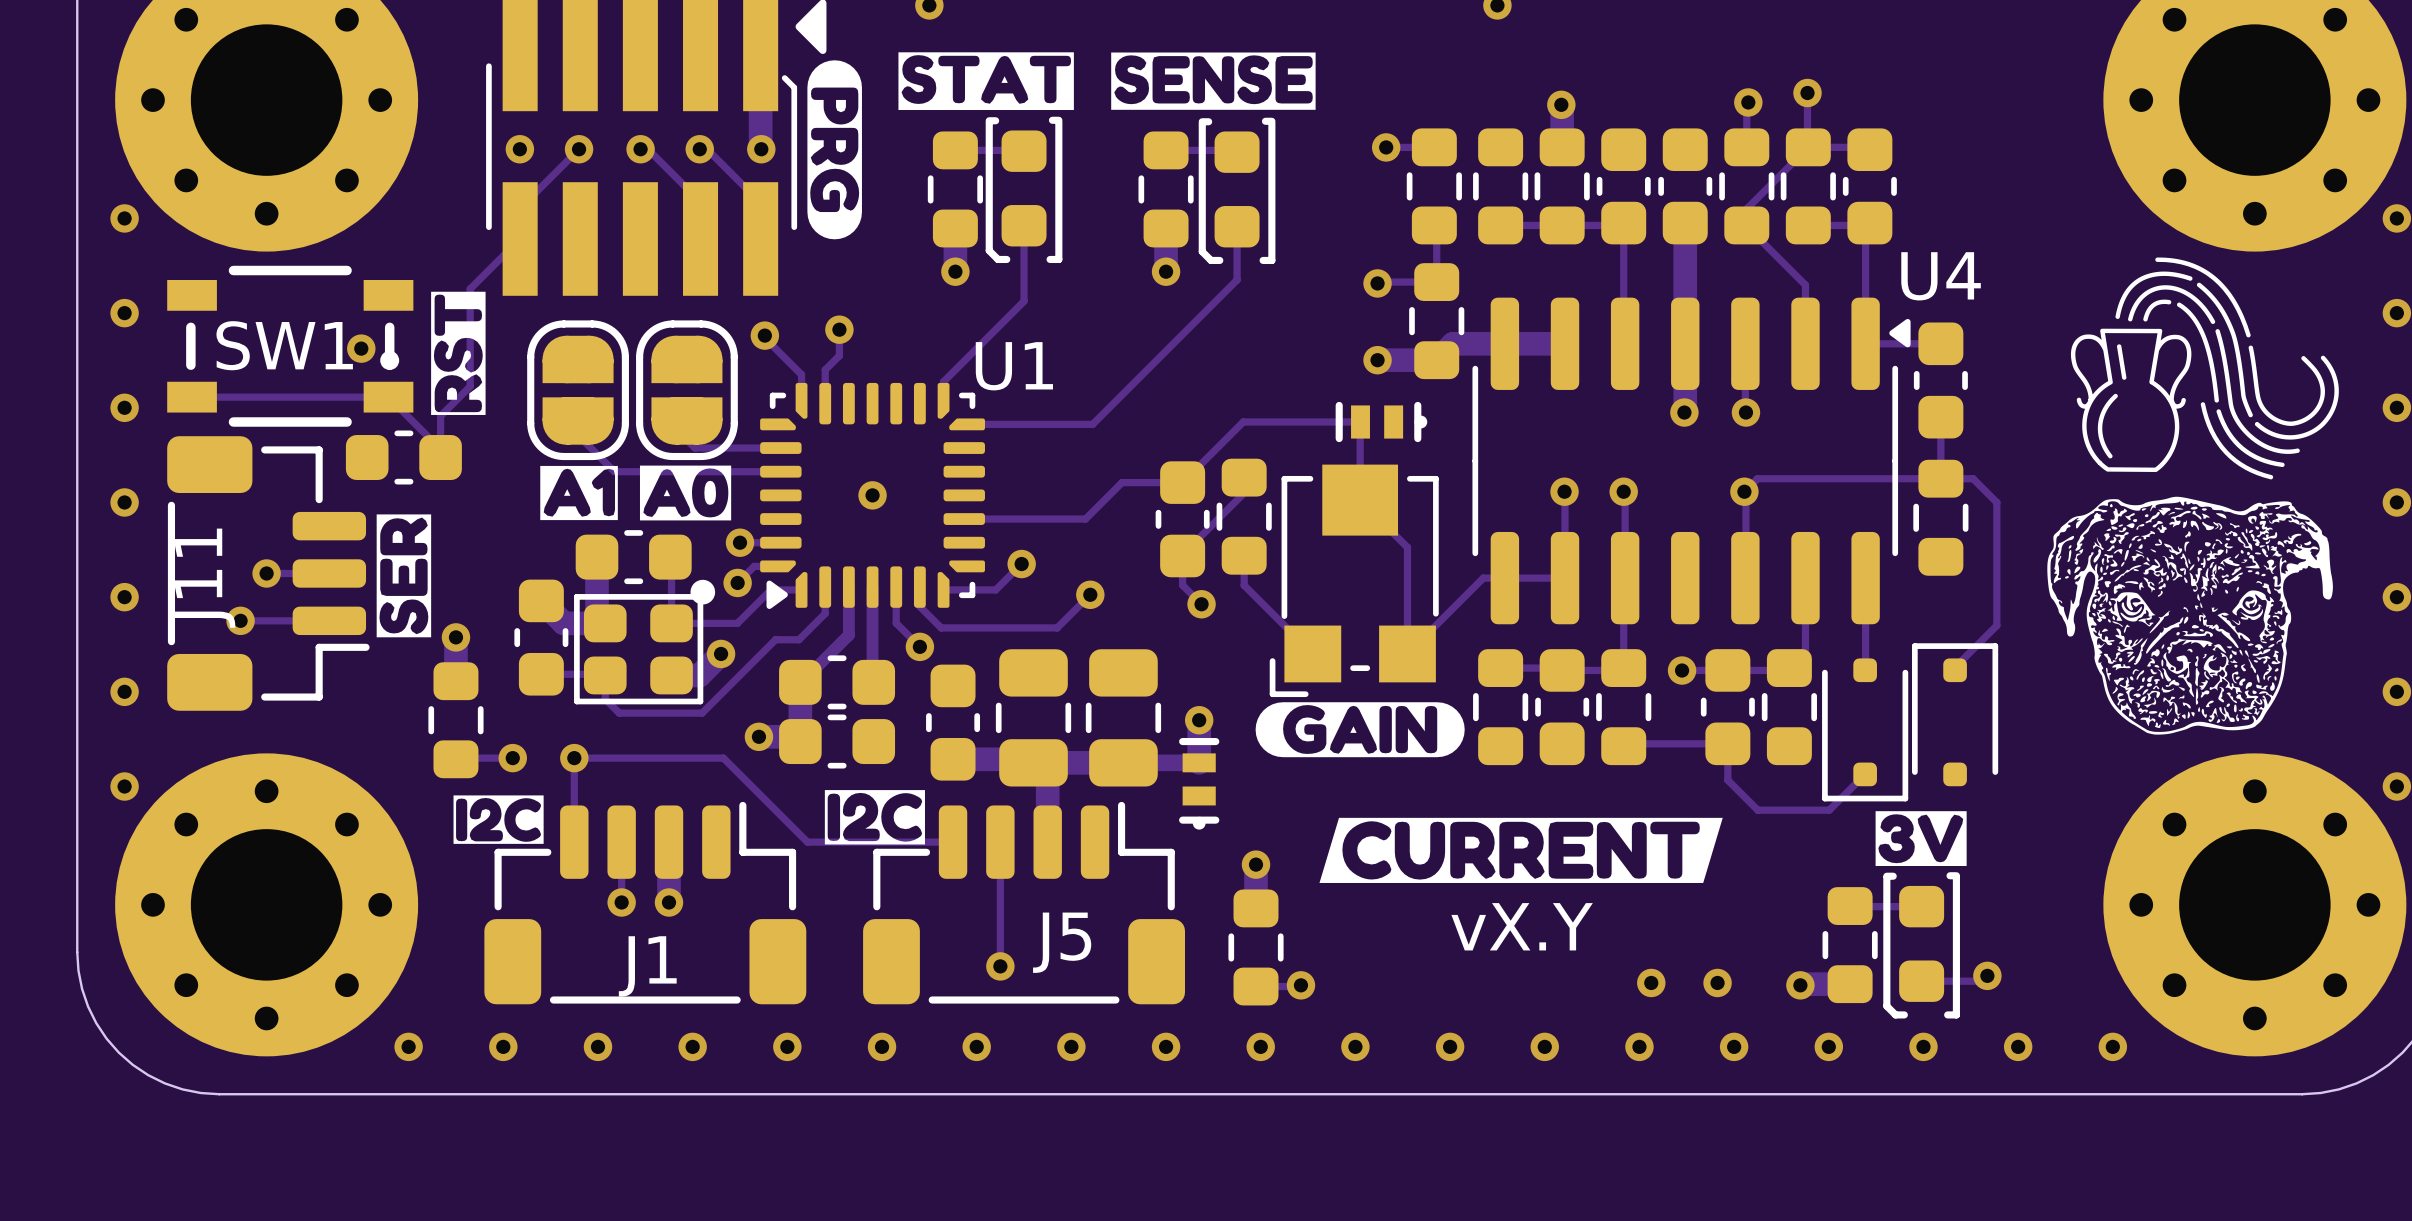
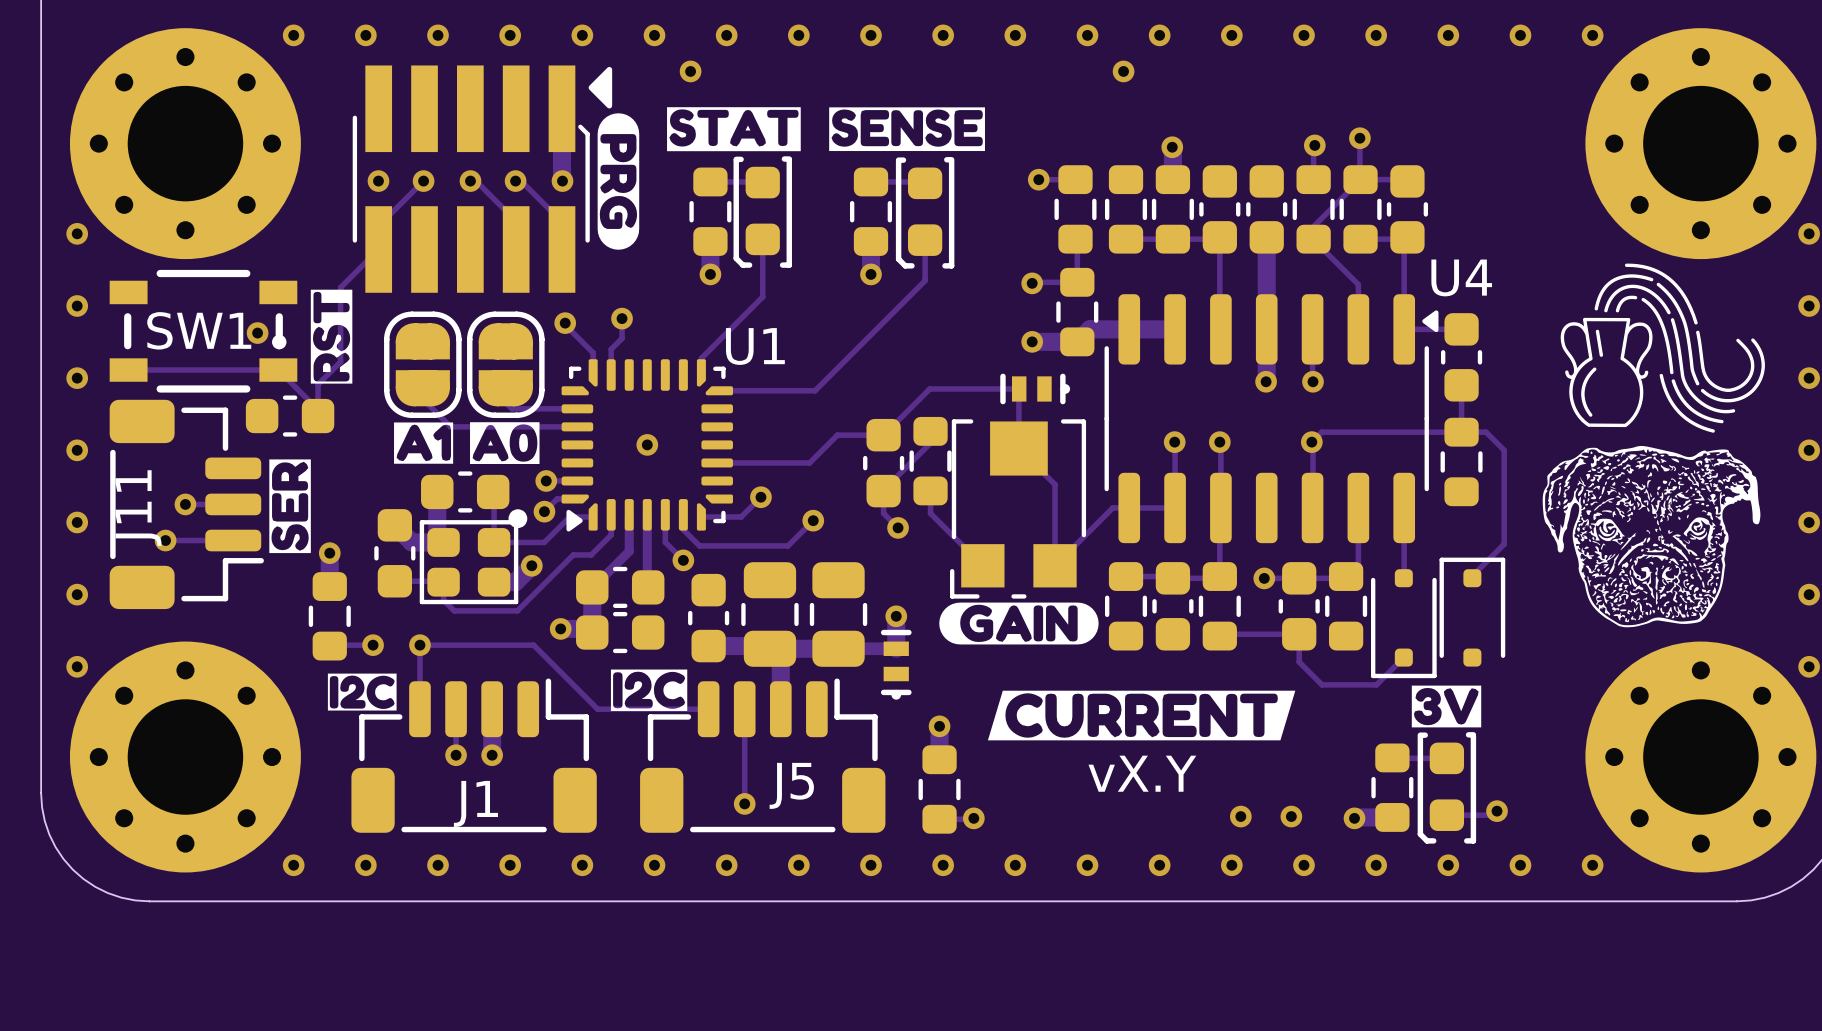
part footprint: [1269, 464, 1439, 698] -> [950, 419, 1087, 599]

